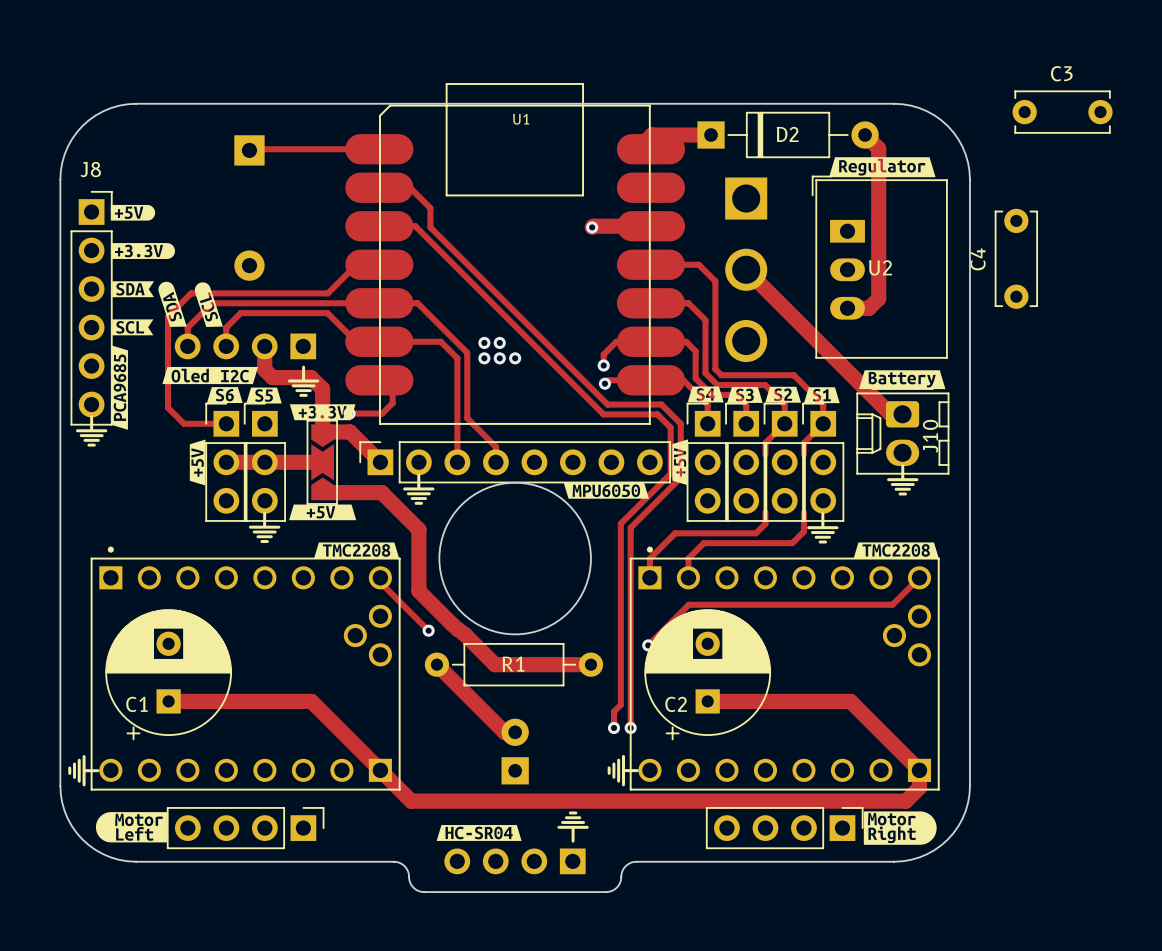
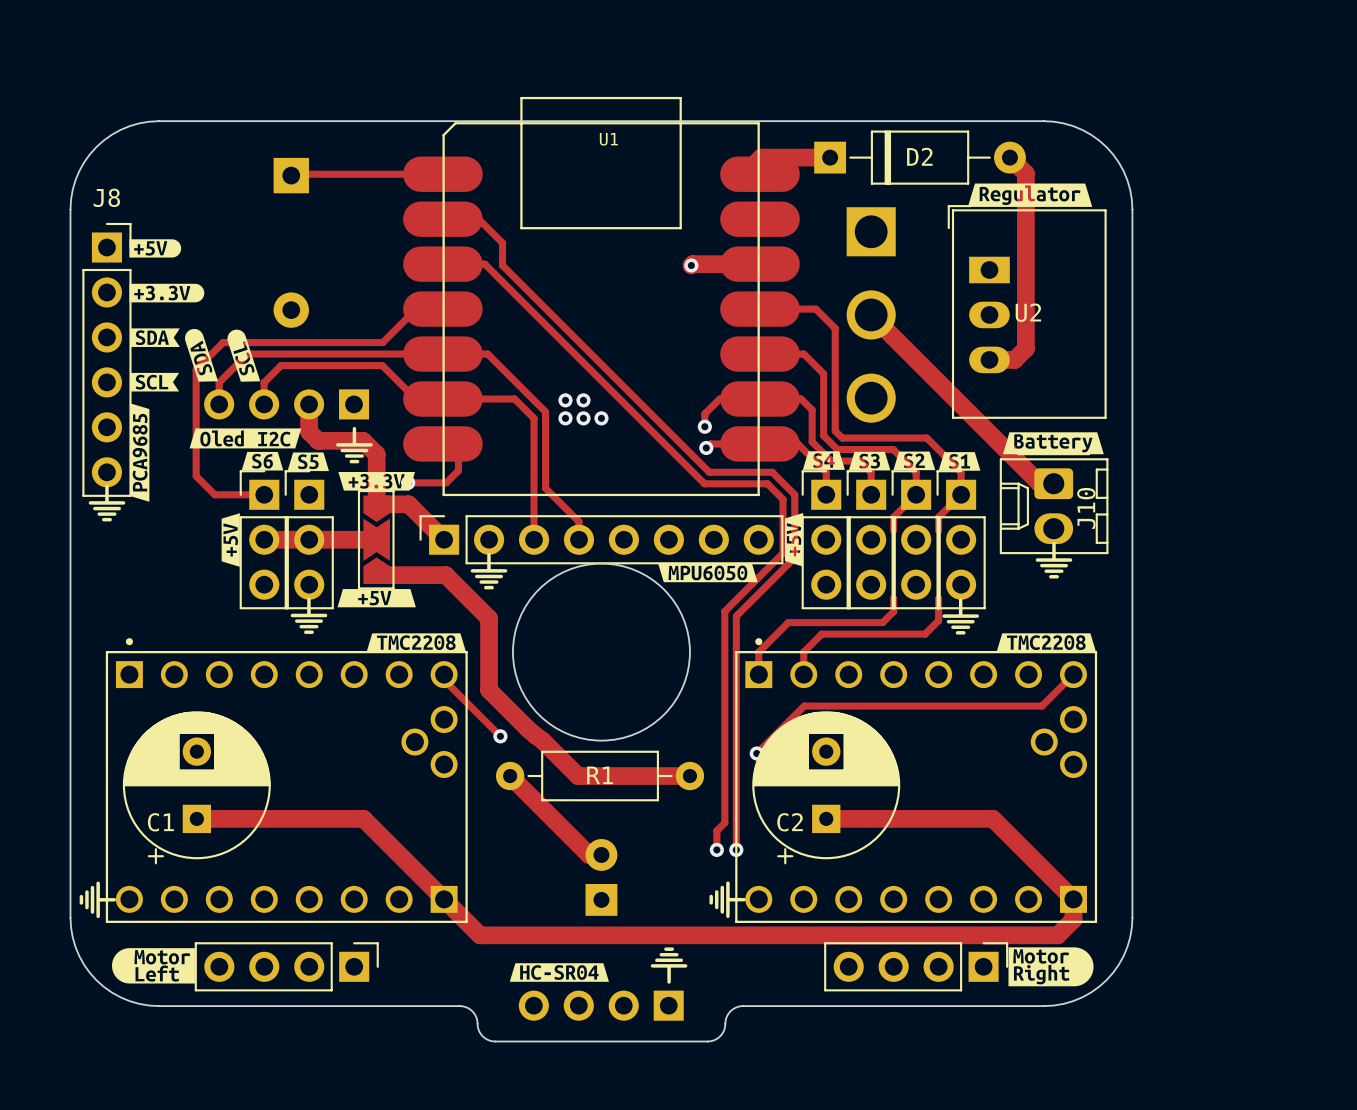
C3: (1062, 112) -> none
C4: (1016, 258) -> none

